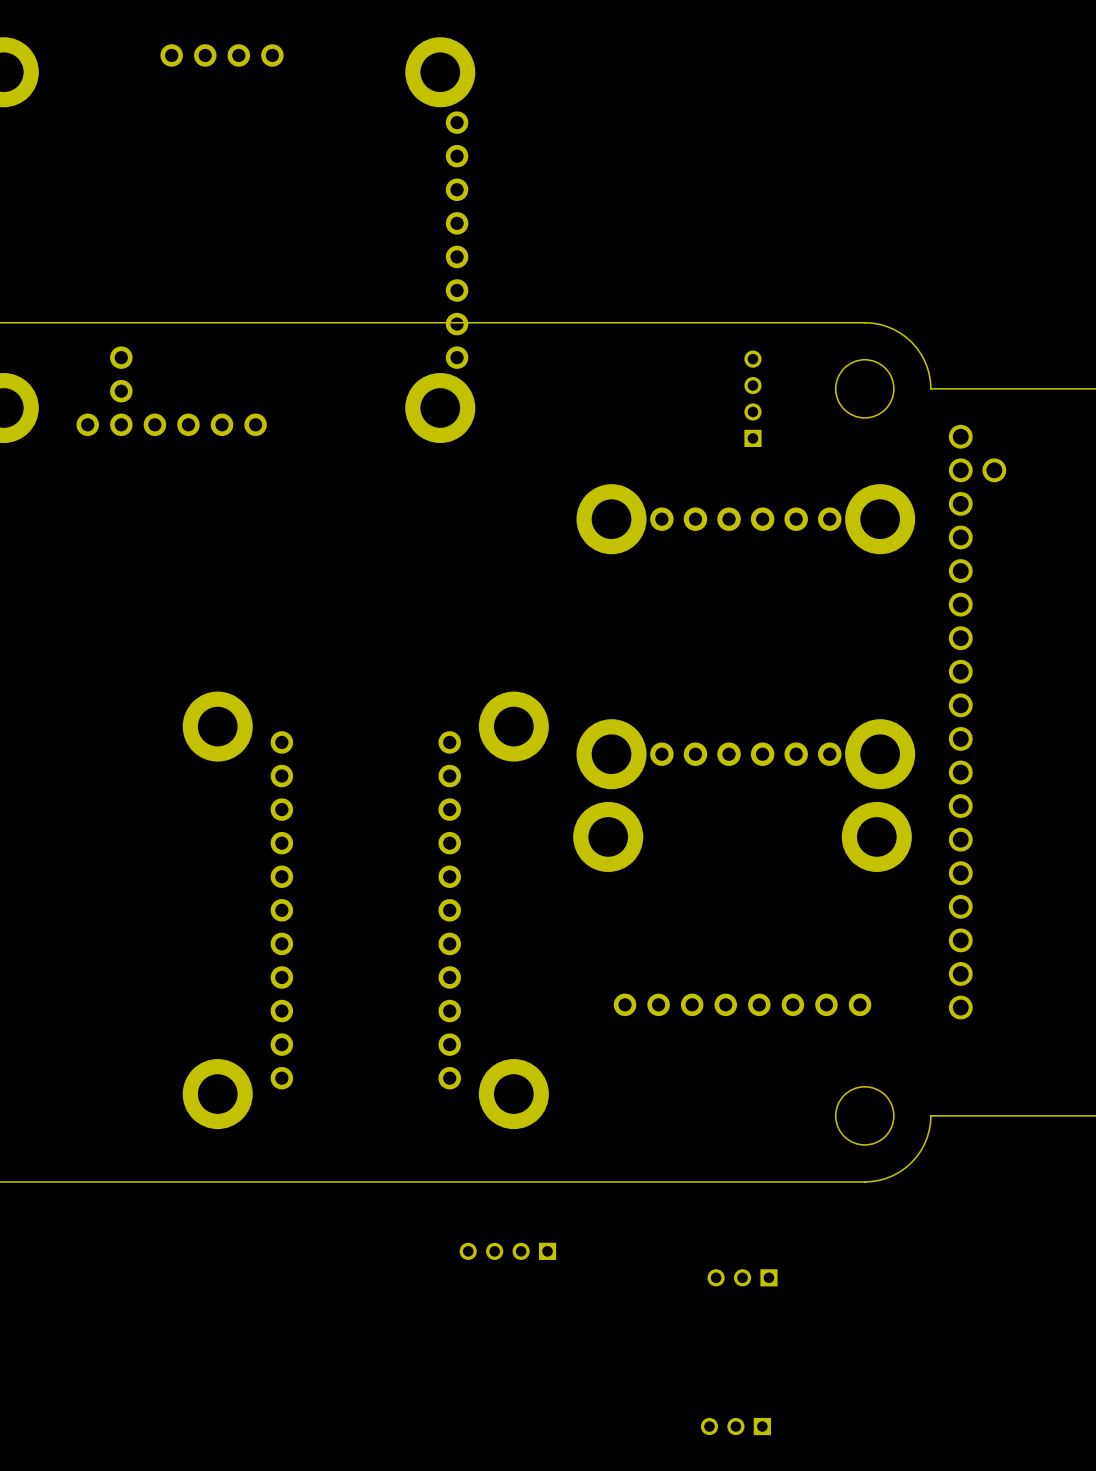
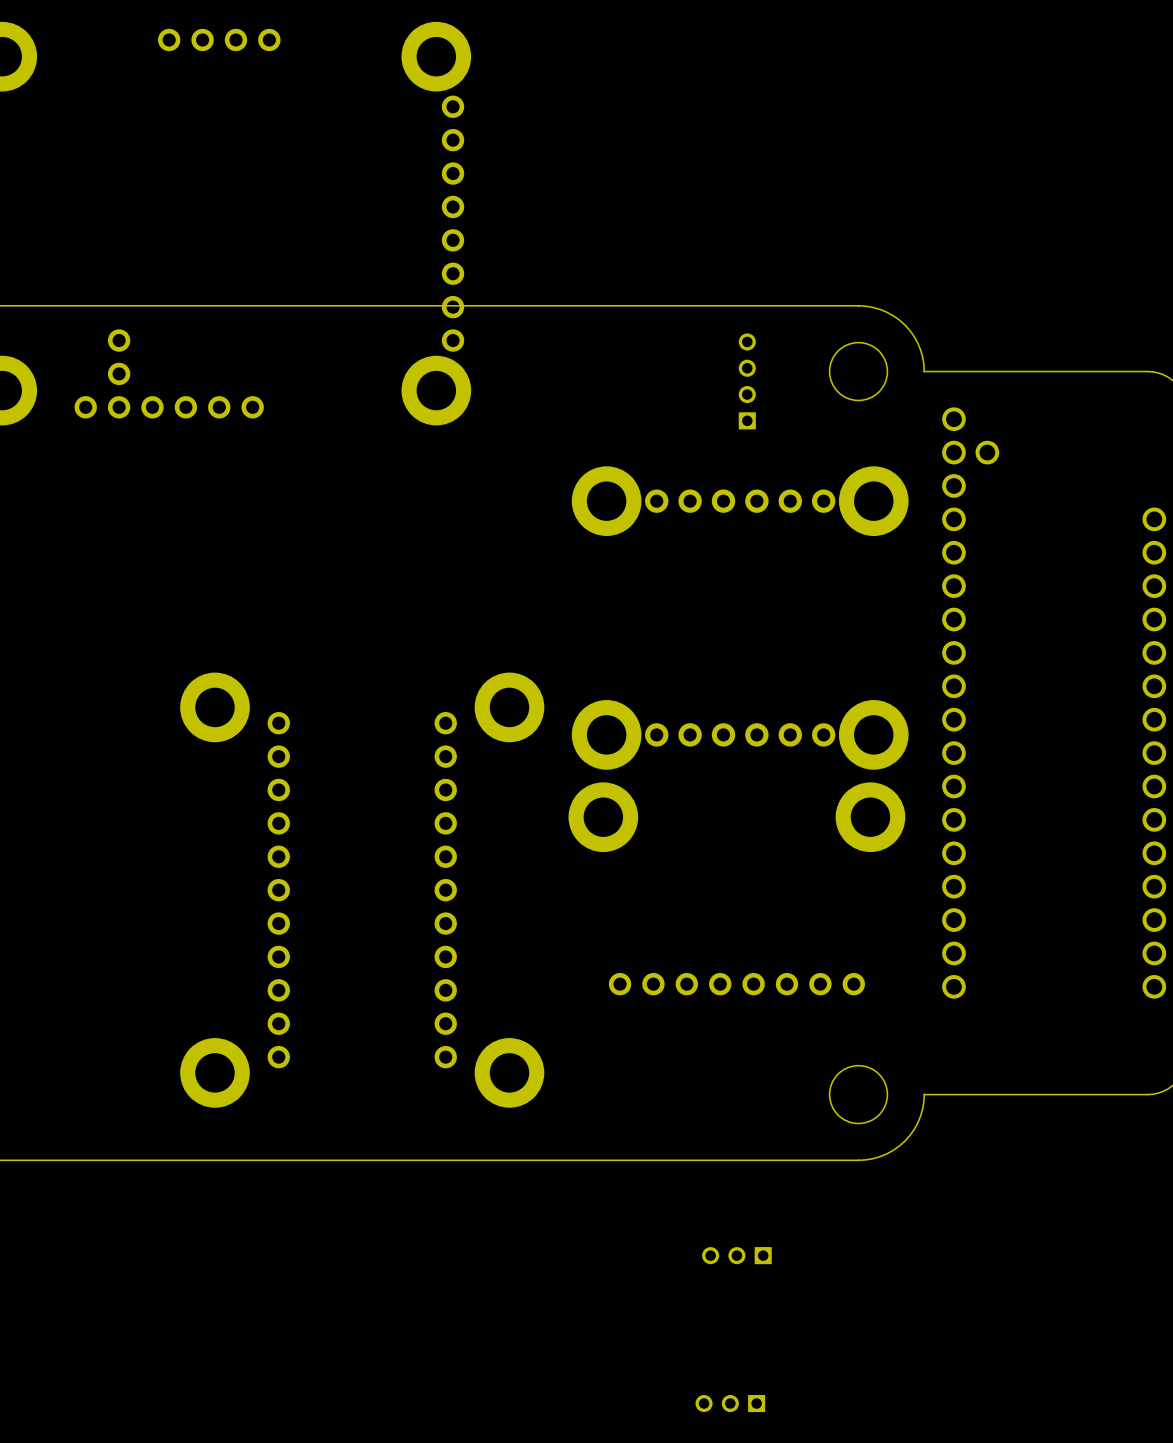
part: (507, 1251) -> none

